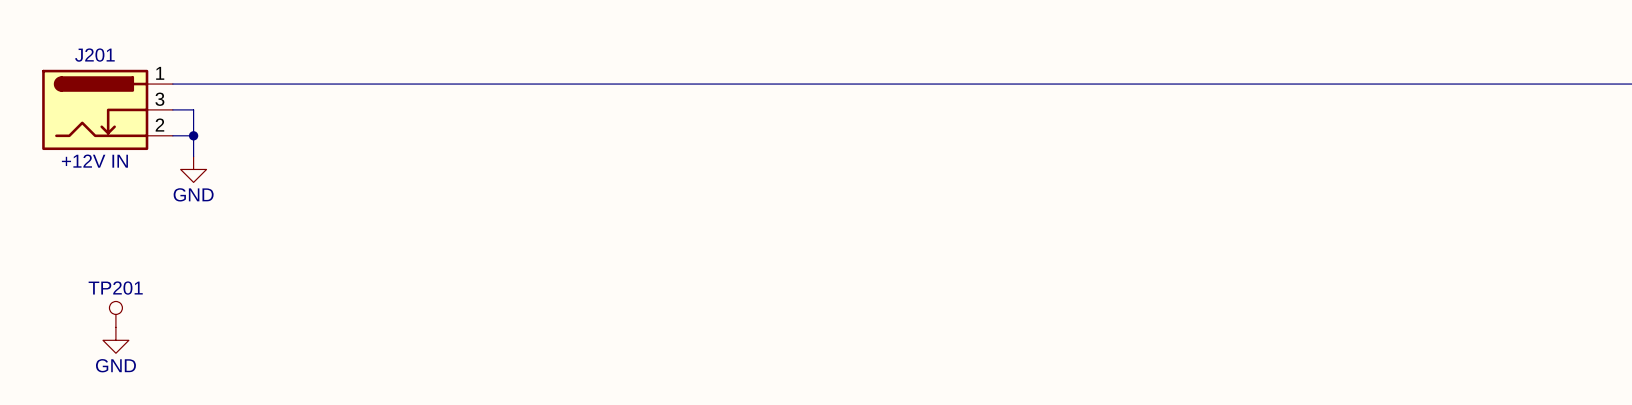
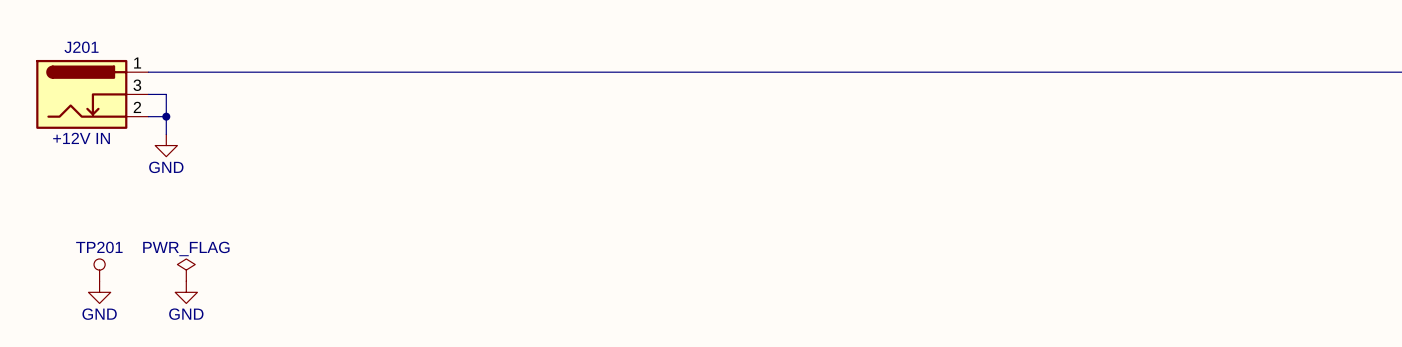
power symbol: none -> PWR_FLAG (186, 270)
power symbol: none -> GND (186, 292)

